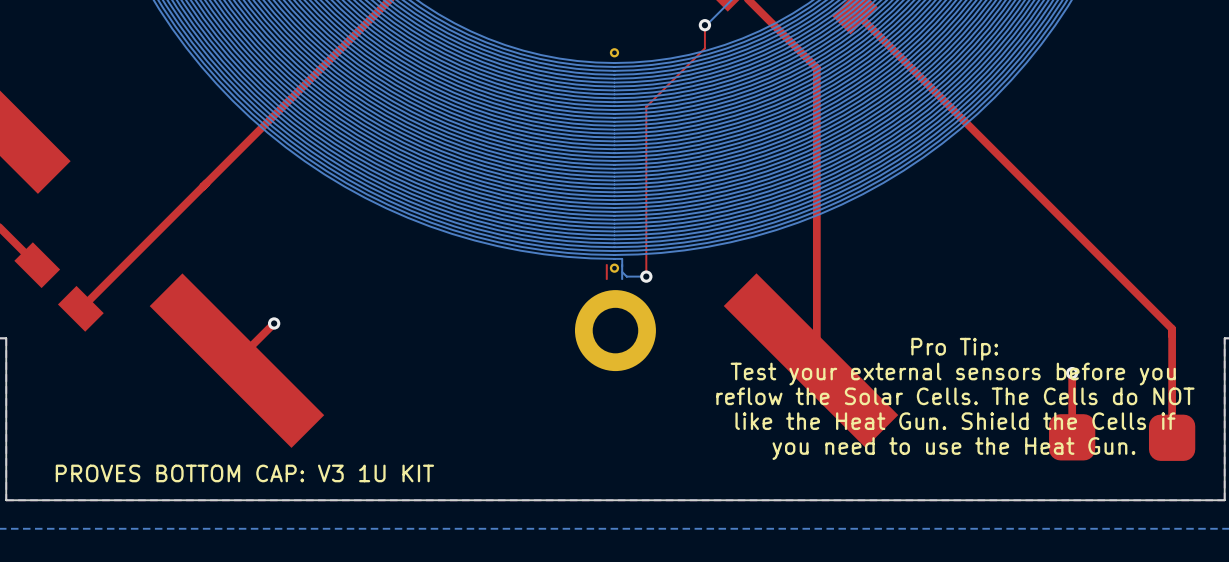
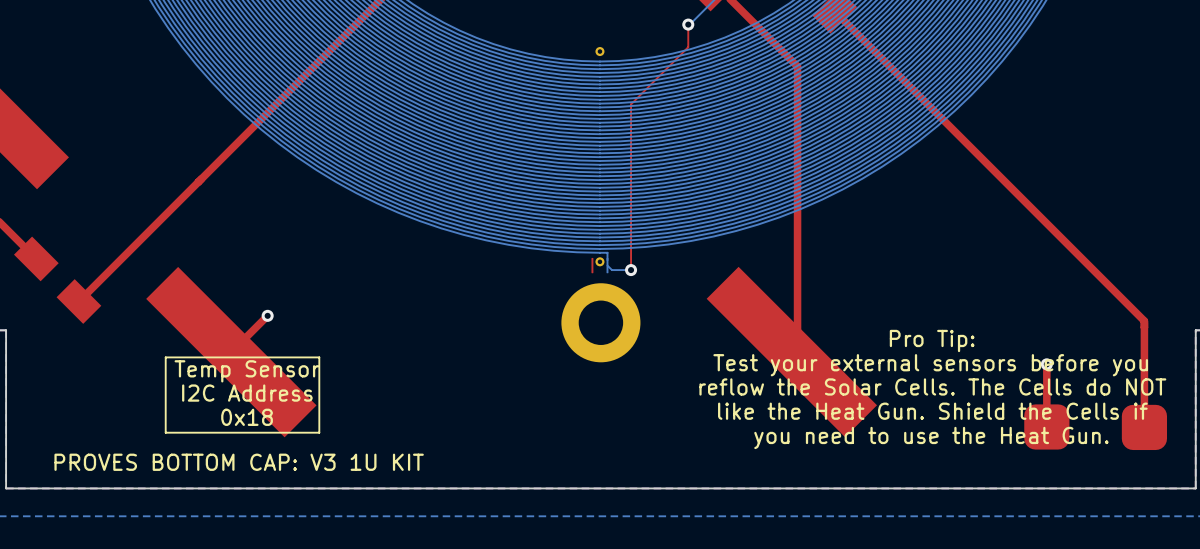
line: none -> (319, 357) (165, 357) (165, 432) (319, 432) (319, 357)
text: none -> Temp Sensor (247, 371)
text: none -> I2C Address (247, 393)
text: none -> 0x18 (247, 417)

